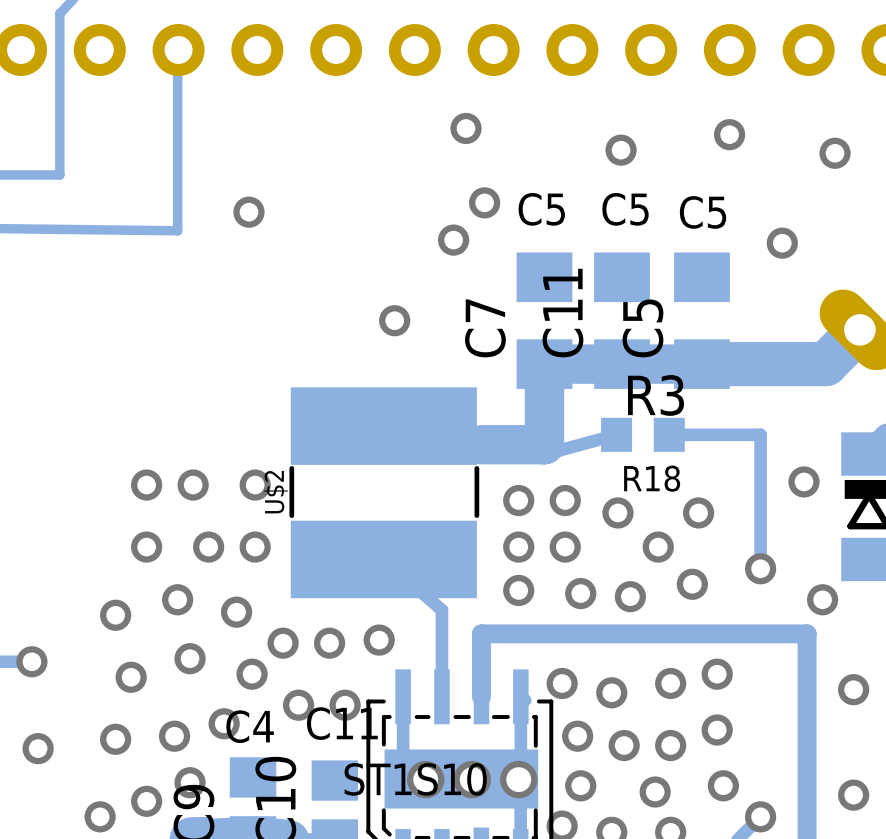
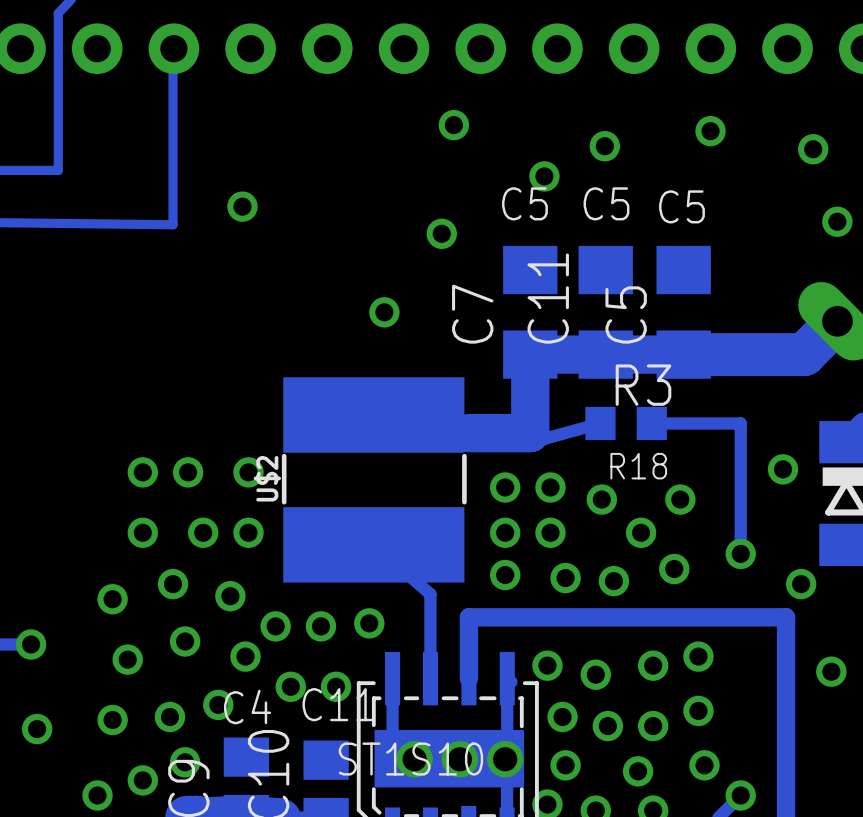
via position: (484, 202) -> (544, 176)
via position: (782, 243) -> (837, 221)
via: (853, 795) -> none

